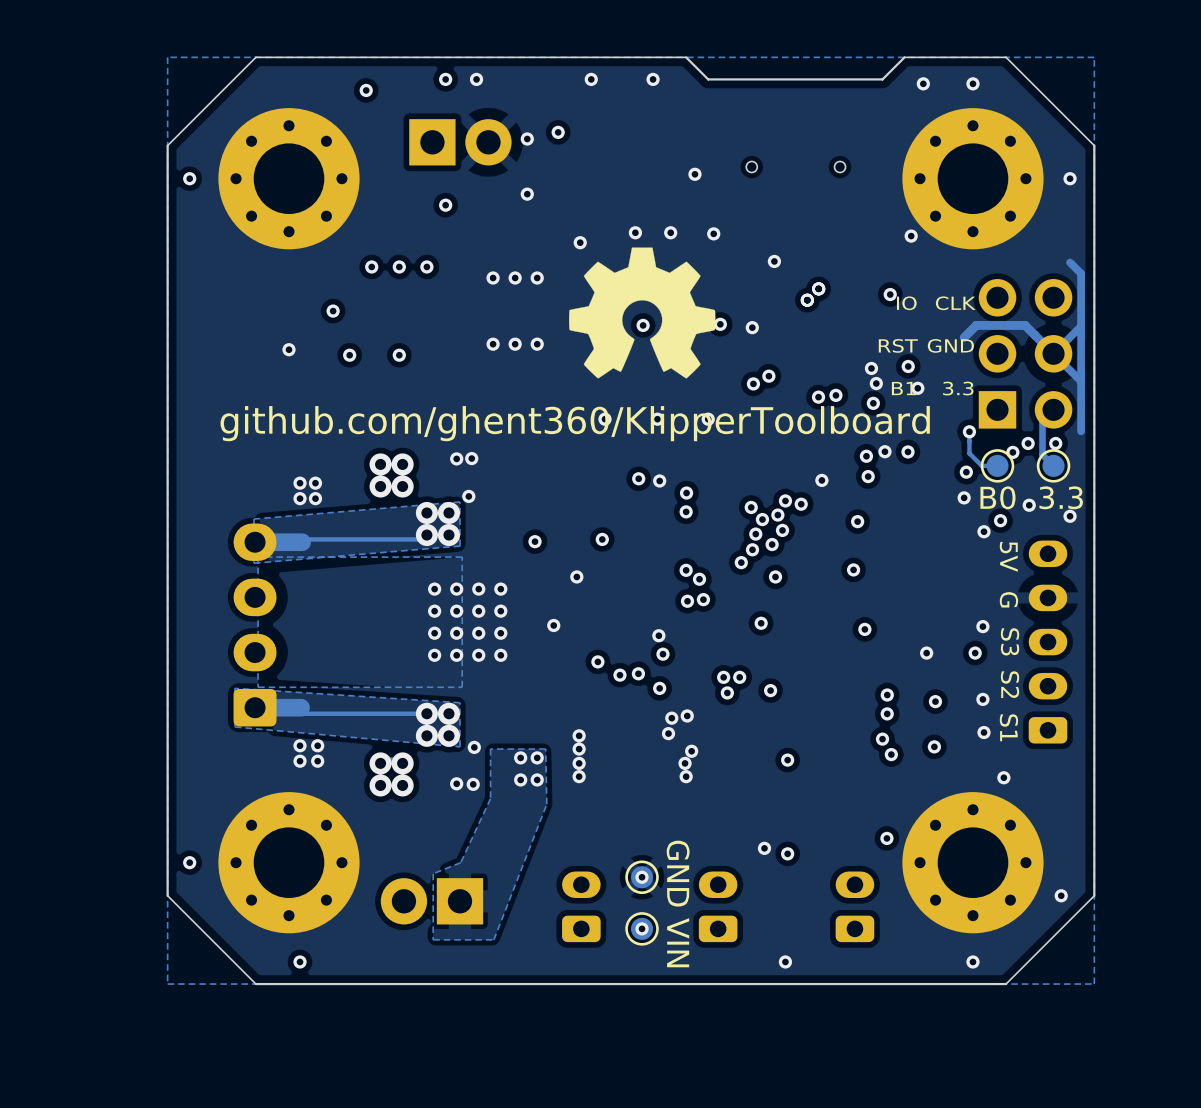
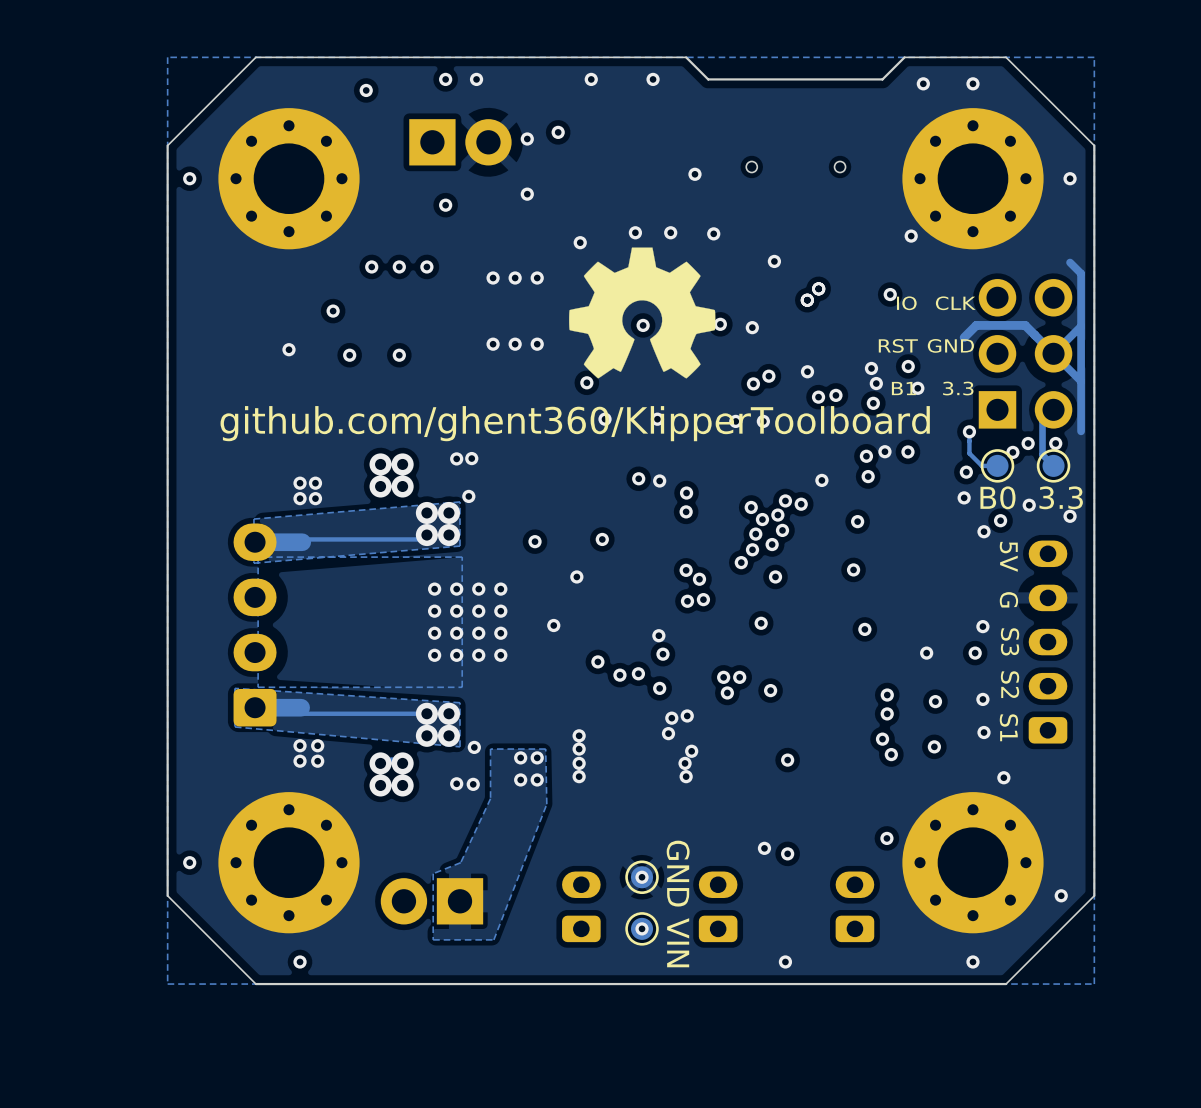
via: none -> (807, 371)
via: none -> (586, 382)
via: (708, 419) -> none
via: none -> (735, 421)
via: none -> (763, 421)

